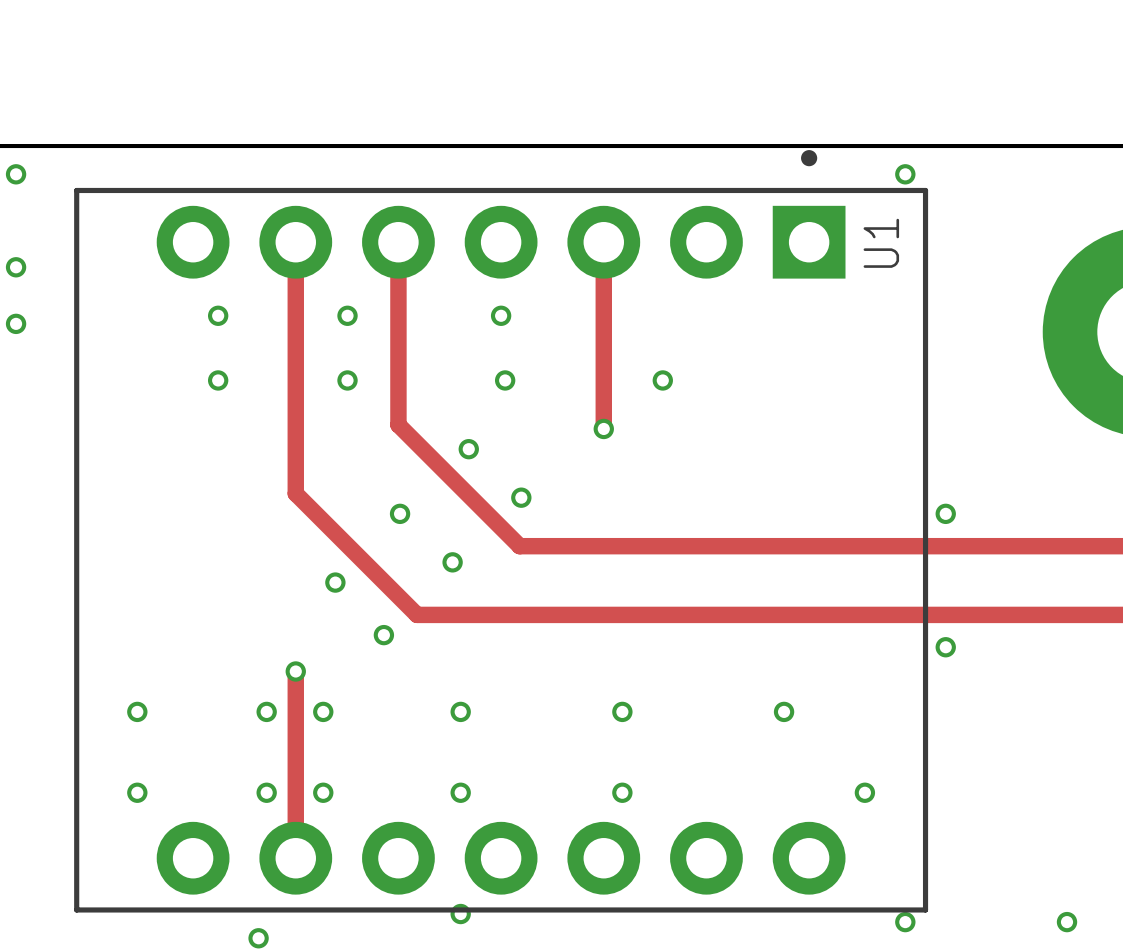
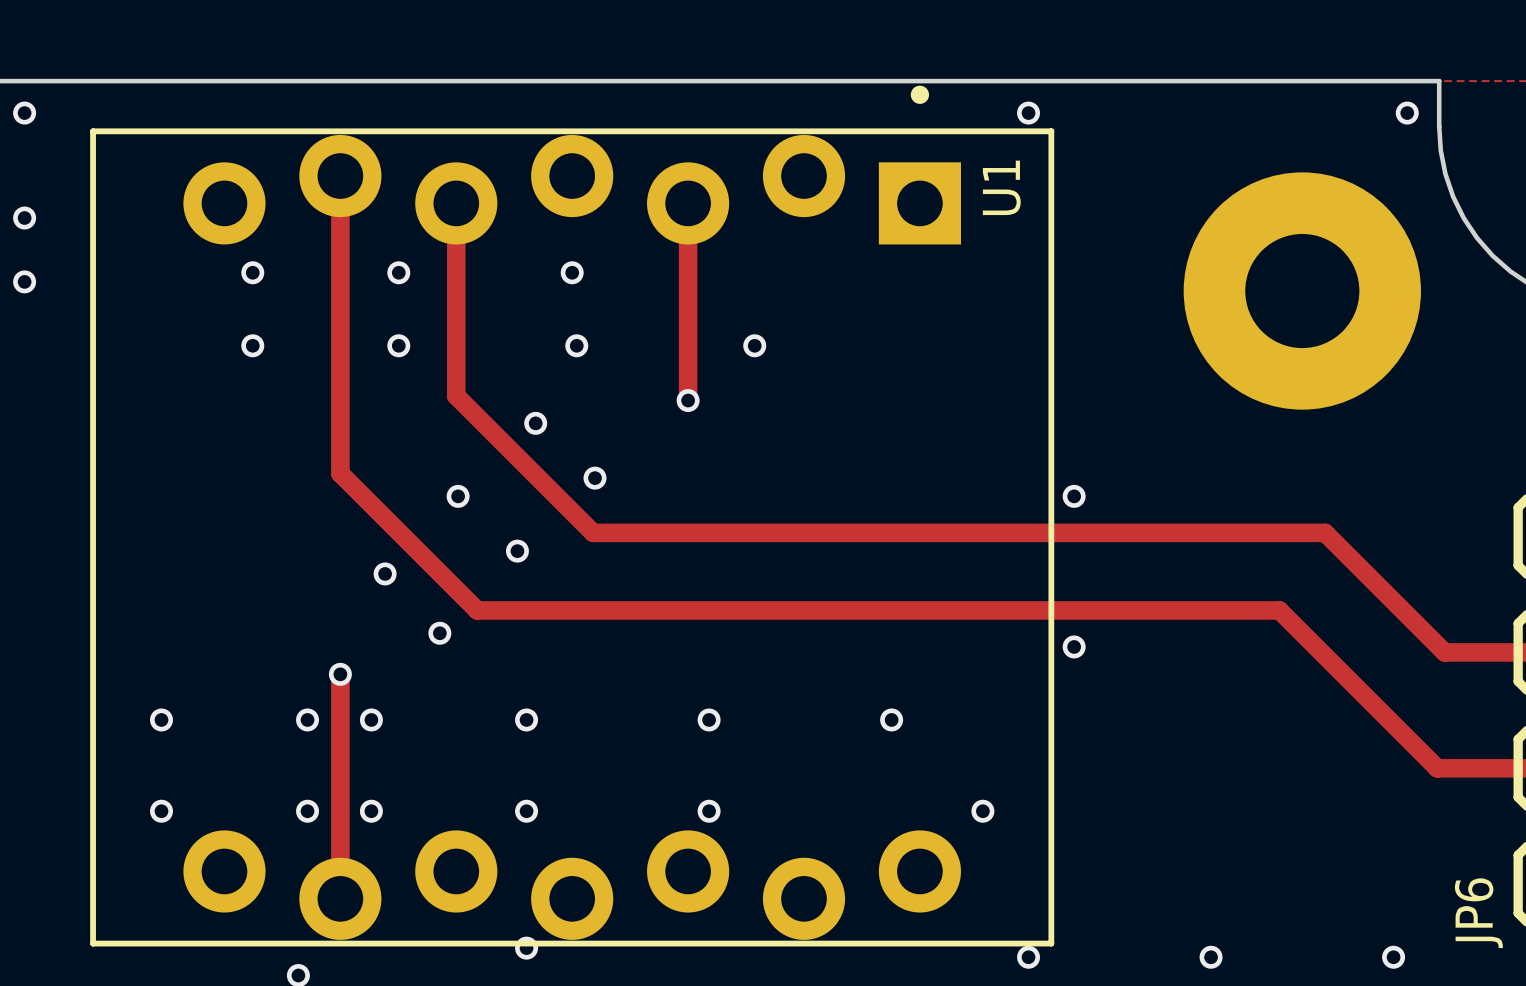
U1 footprint: [74, 150, 929, 913] -> [90, 85, 1055, 947]

